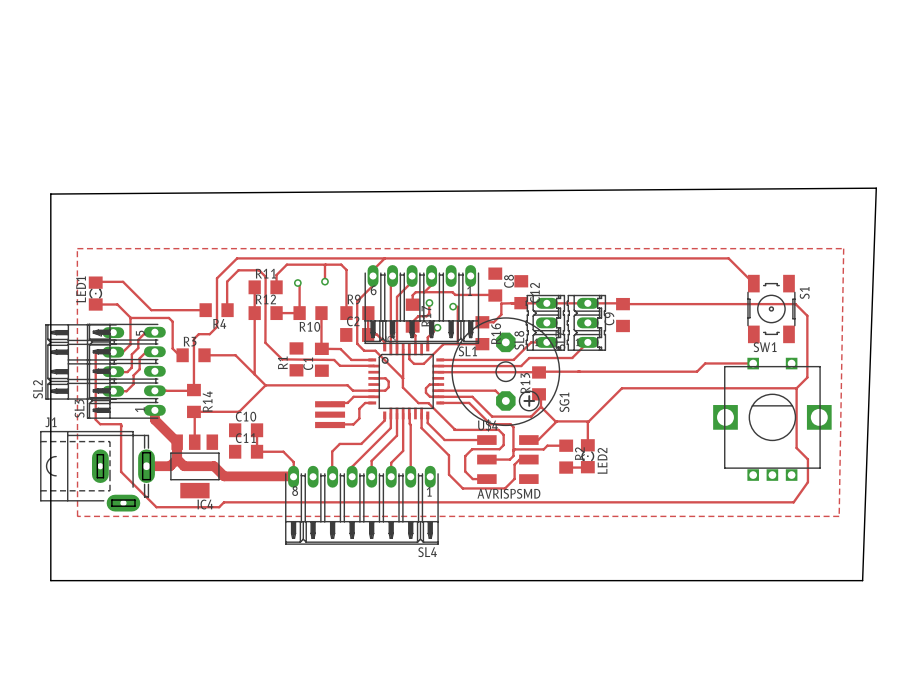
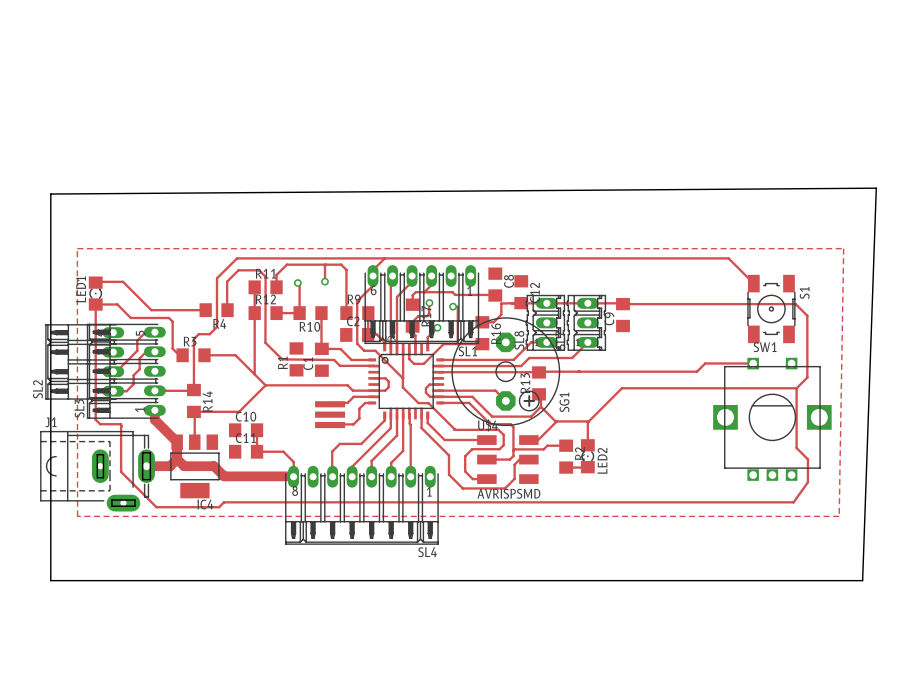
track: none -> (95, 304) (95, 352)
track: (130, 317) (130, 344) (122, 352) (113, 352) -> none
track: none -> (146, 331) (137, 340) (137, 350) (116, 371)
track: (154, 332) (145, 332) (138, 339) (138, 348) (131, 354) (131, 367) (127, 372) (117, 371) -> none

